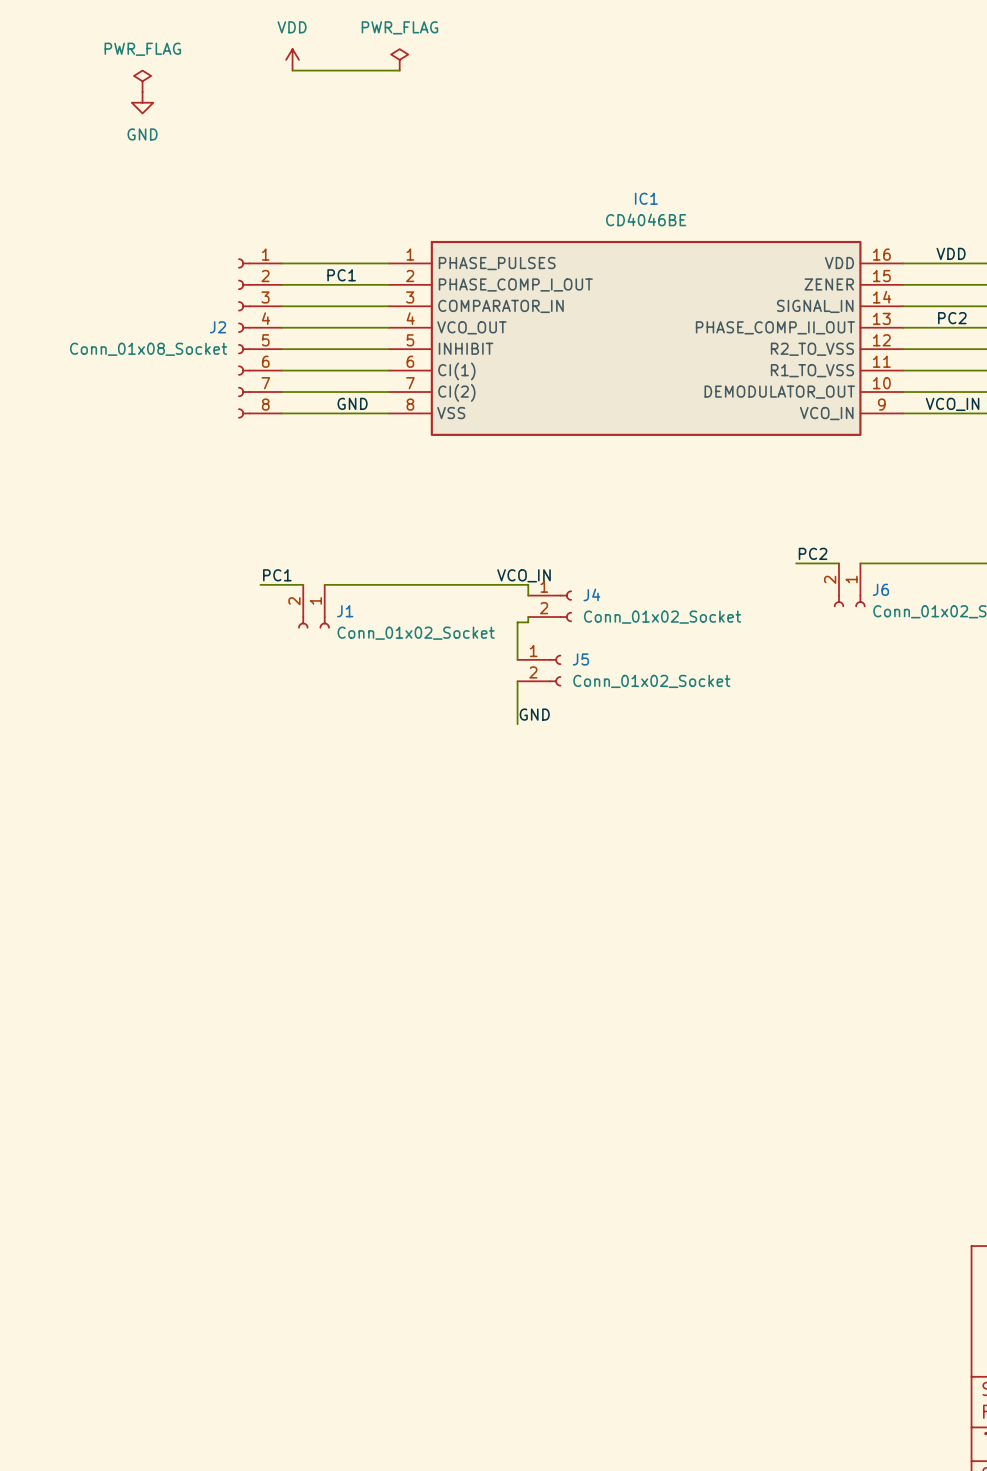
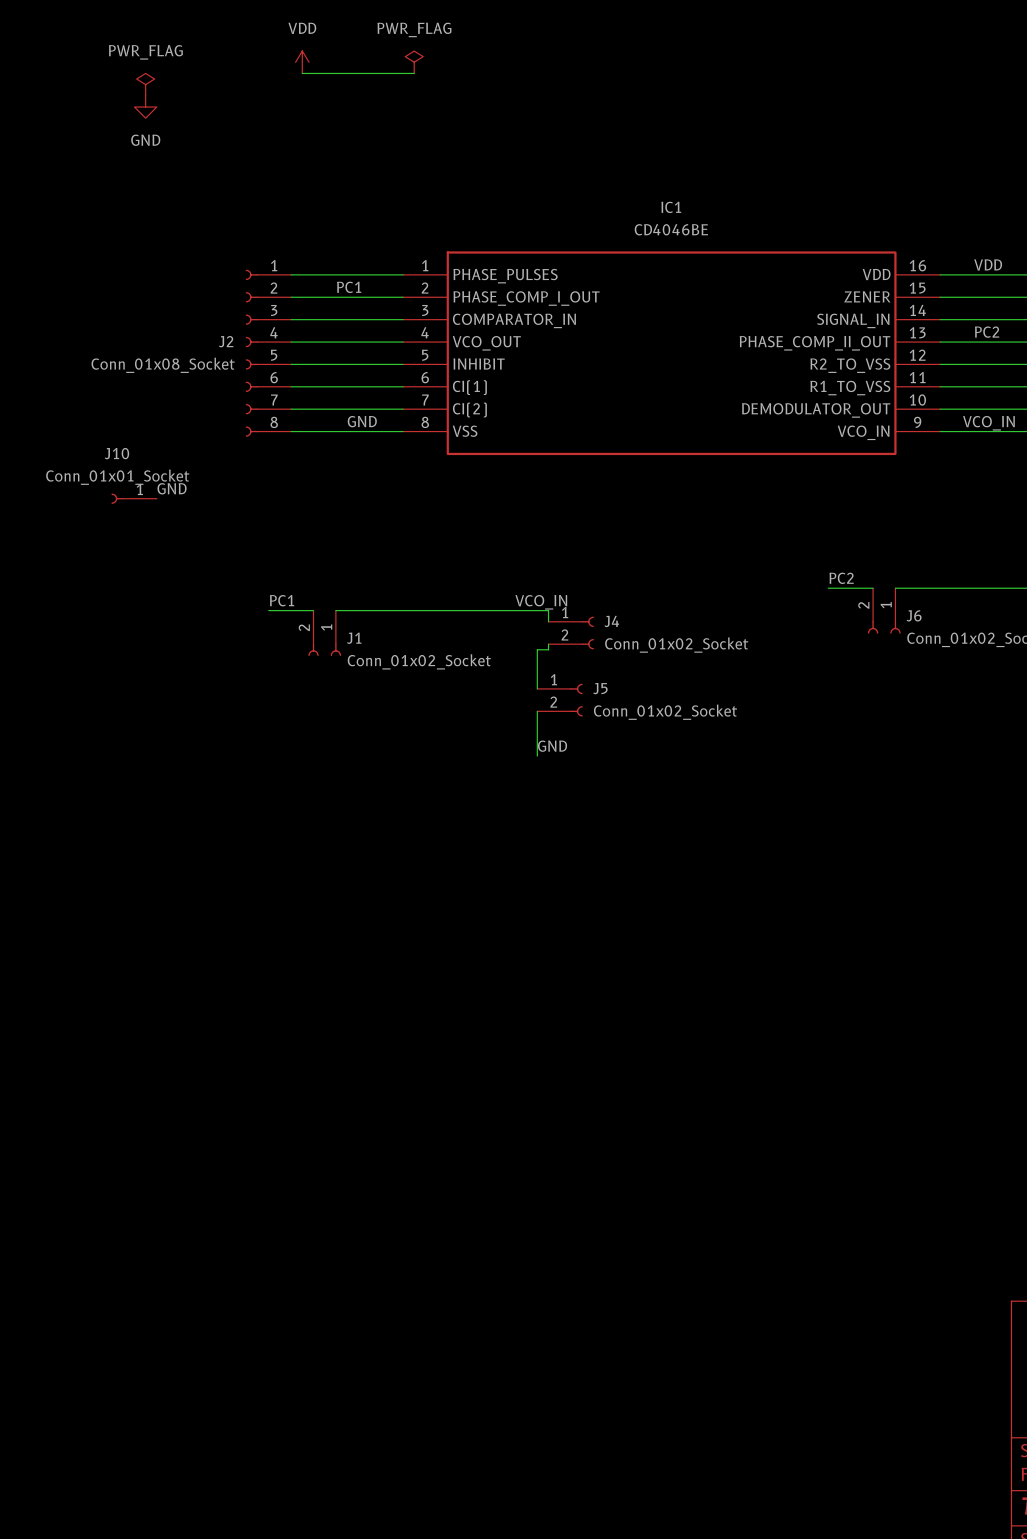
label: none -> GND (172, 488)
J10: none -> Conn_01x01_Socket (134, 498)

